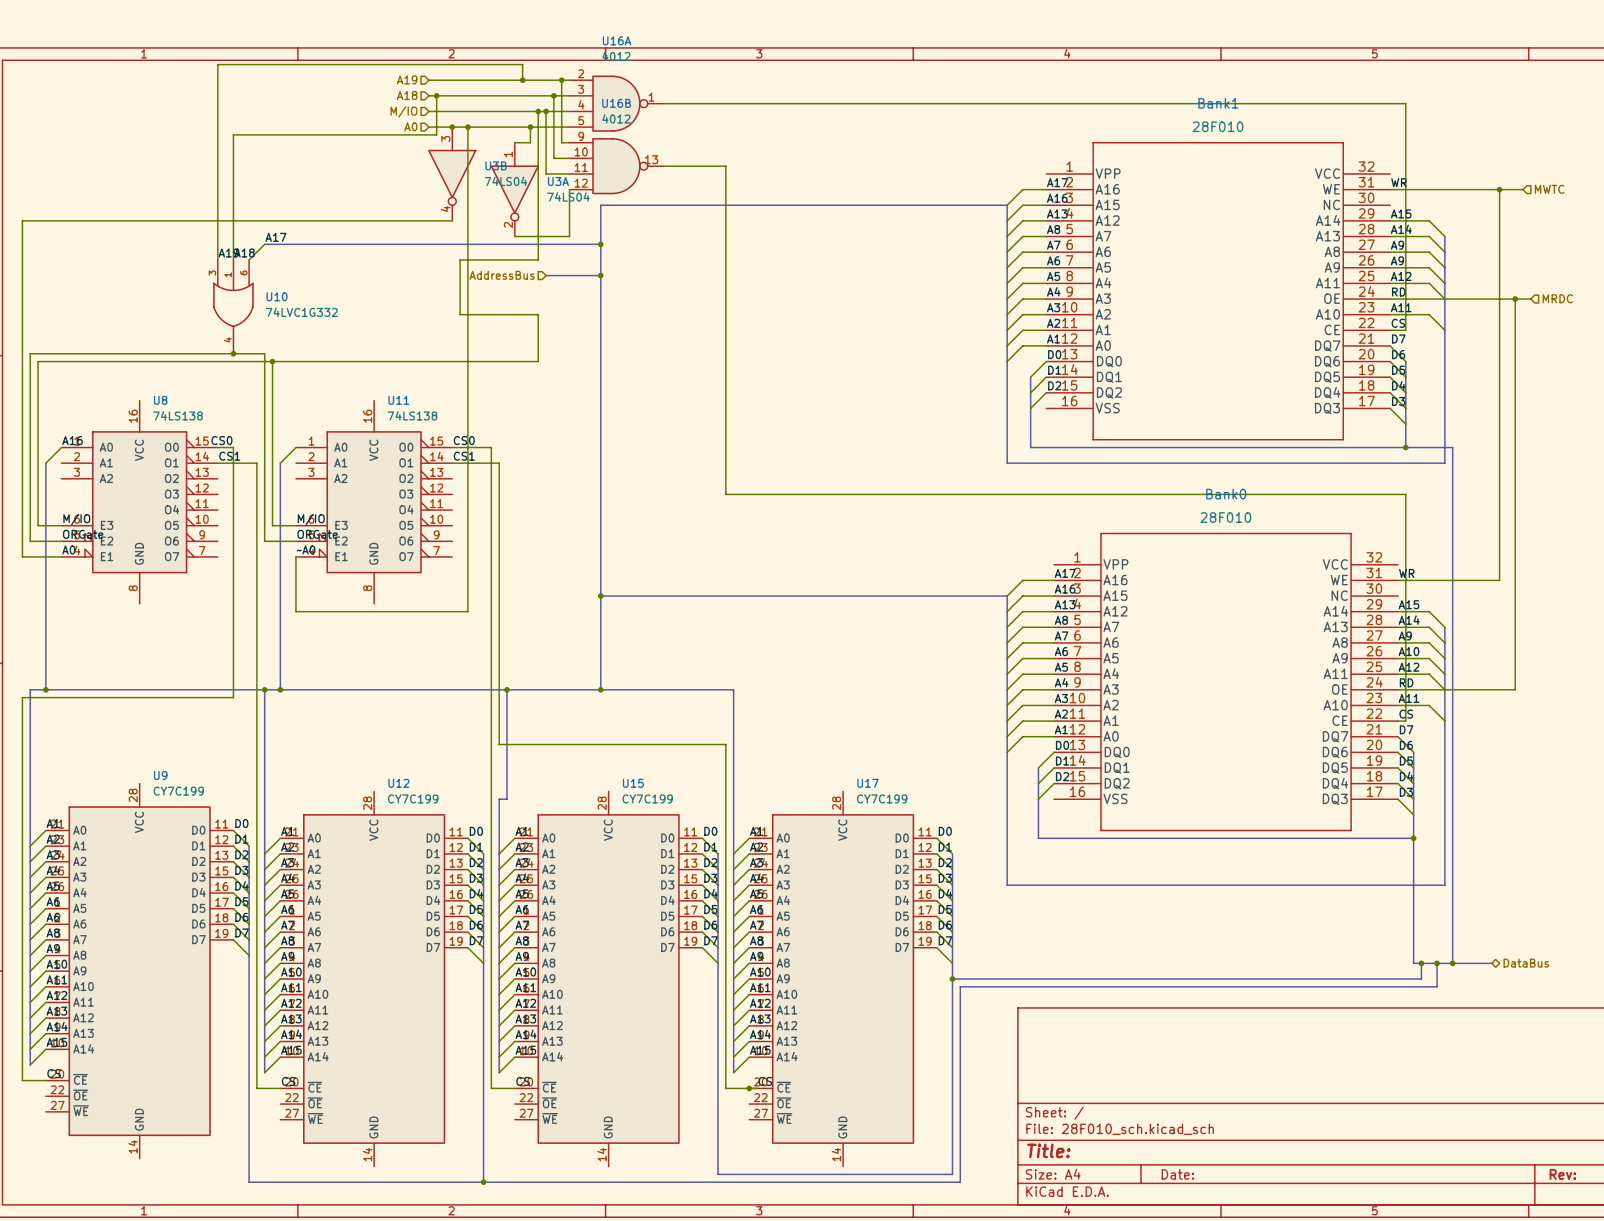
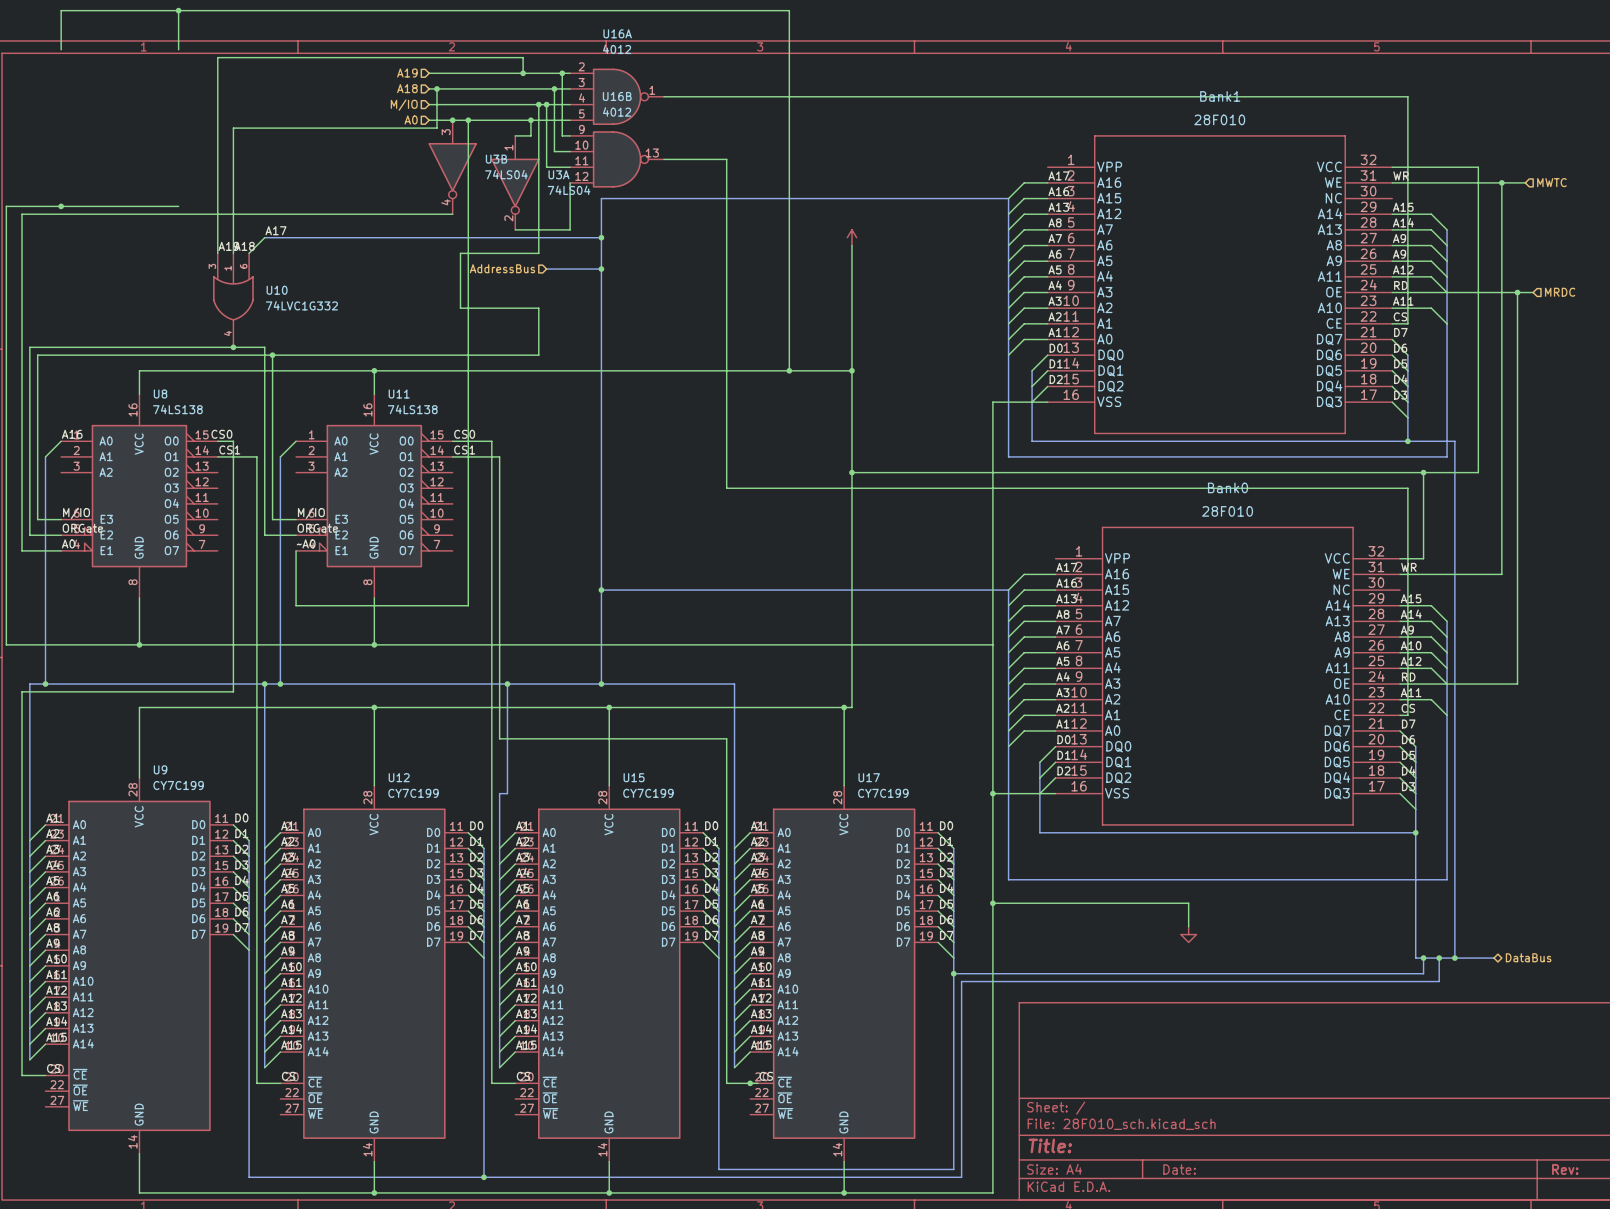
wire: none -> (178, 10) (178, 49)
junction: none -> (178, 10)
wire: none -> (61, 49) (61, 10) (789, 10) (789, 370)
wire: none -> (1392, 167) (1478, 167) (1478, 472) (851, 472)
junction: none -> (61, 206)
wire: none -> (178, 206) (6, 206) (6, 644) (992, 644)
power symbol: none -> (851, 237)
wire: none -> (851, 245) (851, 707) (139, 707) (139, 777)
wire: none -> (374, 370) (374, 394)
junction: none -> (374, 370)
junction: none -> (789, 370)
wire: none -> (851, 370) (139, 370) (139, 394)
junction: none -> (851, 370)
wire: none -> (1047, 402) (992, 402) (992, 1192) (139, 1192) (139, 1153)
junction: none -> (851, 472)
wire: none -> (1423, 472) (1423, 558) (1400, 558)
junction: none -> (1423, 472)
wire: none -> (139, 597) (139, 644)
wire: none -> (374, 597) (374, 644)
junction: none -> (139, 644)
junction: none -> (374, 644)
wire: none -> (374, 707) (374, 785)
junction: none -> (374, 707)
wire: none -> (609, 707) (609, 785)
junction: none -> (609, 707)
wire: none -> (844, 707) (844, 785)
junction: none -> (844, 707)
wire: none -> (992, 793) (1055, 793)
junction: none -> (992, 793)
wire: none -> (992, 903) (1188, 903) (1188, 926)
junction: none -> (992, 903)
power symbol: none -> (1188, 934)
wire: none -> (374, 1161) (374, 1192)
wire: none -> (609, 1161) (609, 1192)
wire: none -> (844, 1161) (844, 1192)
junction: none -> (374, 1192)
junction: none -> (609, 1192)
junction: none -> (844, 1192)

